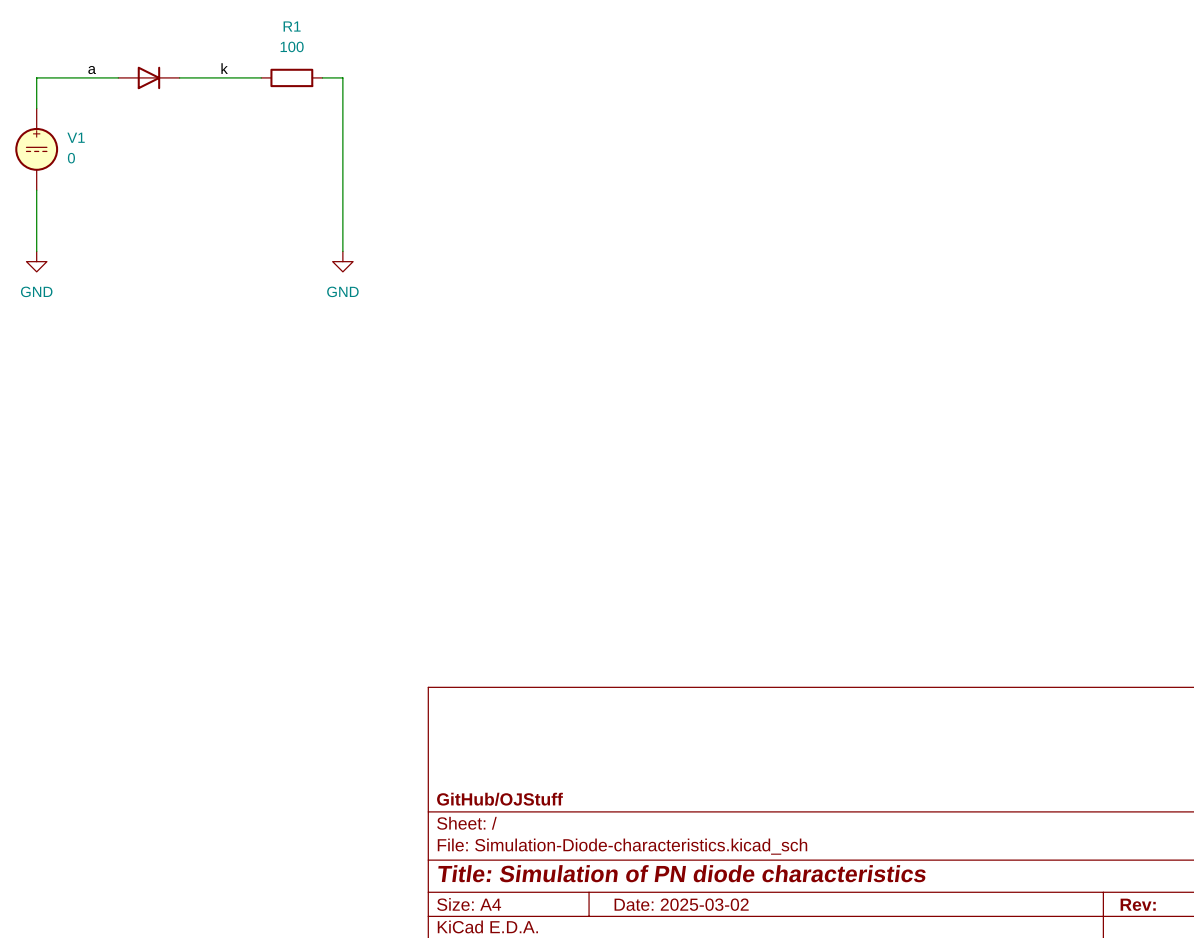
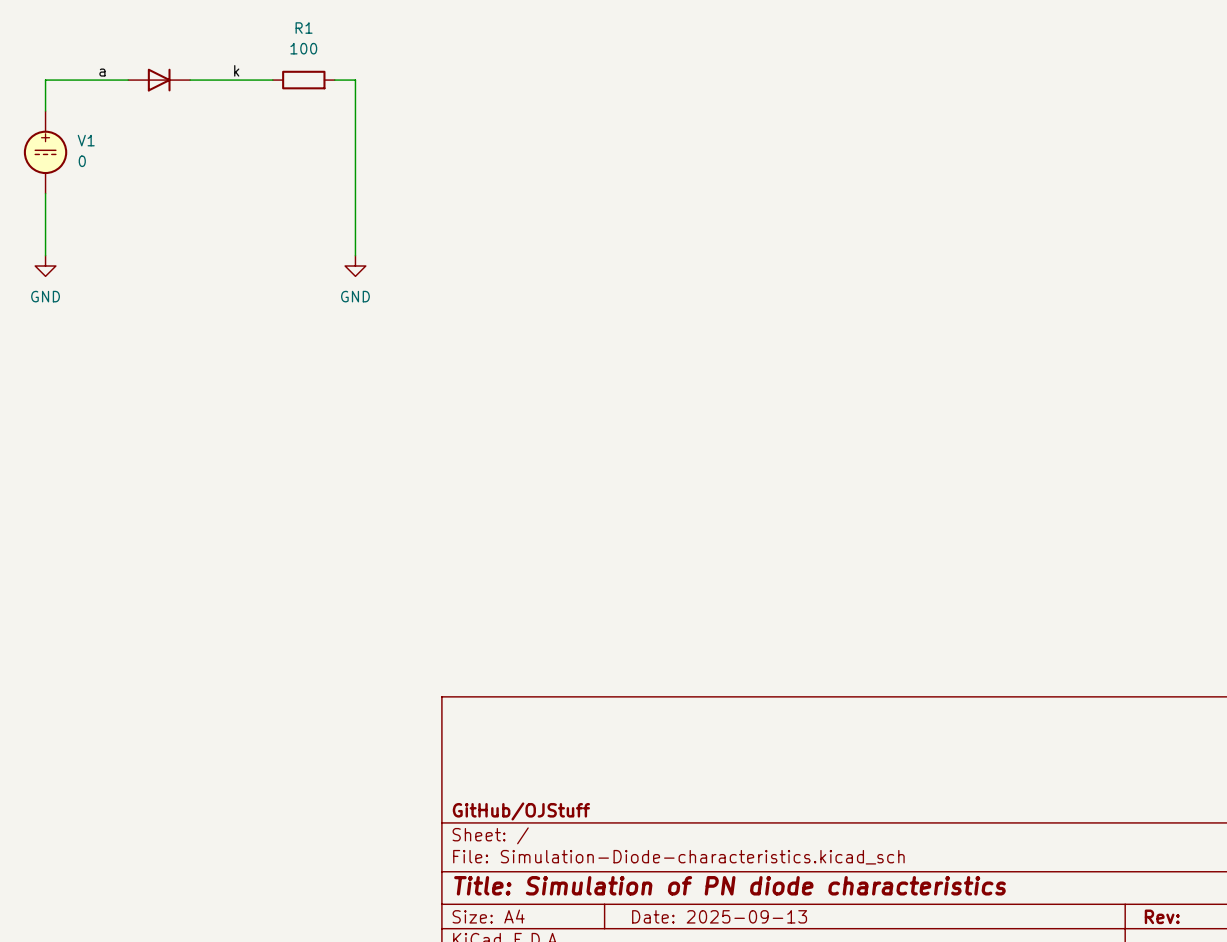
title block: Date: 2025-03-02 (681, 904) -> Date: 2025-09-13 (719, 916)

